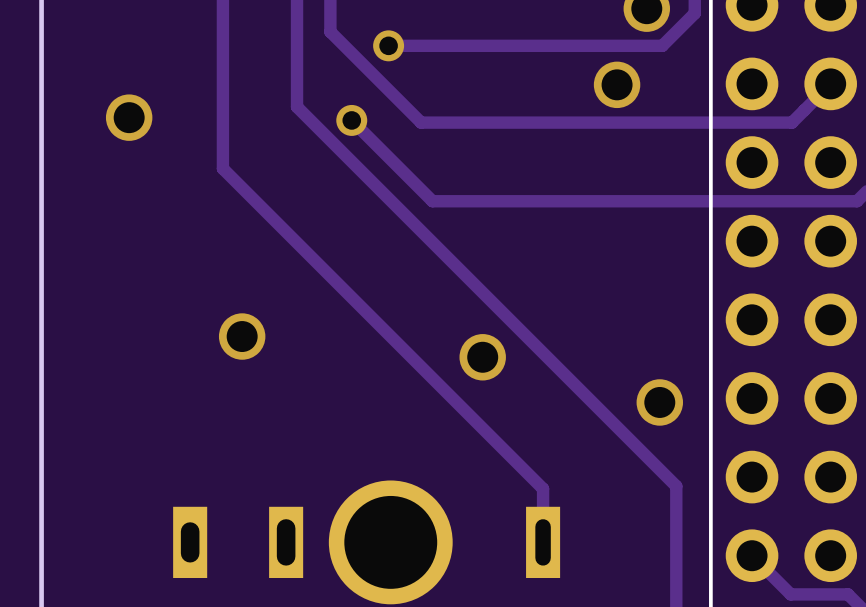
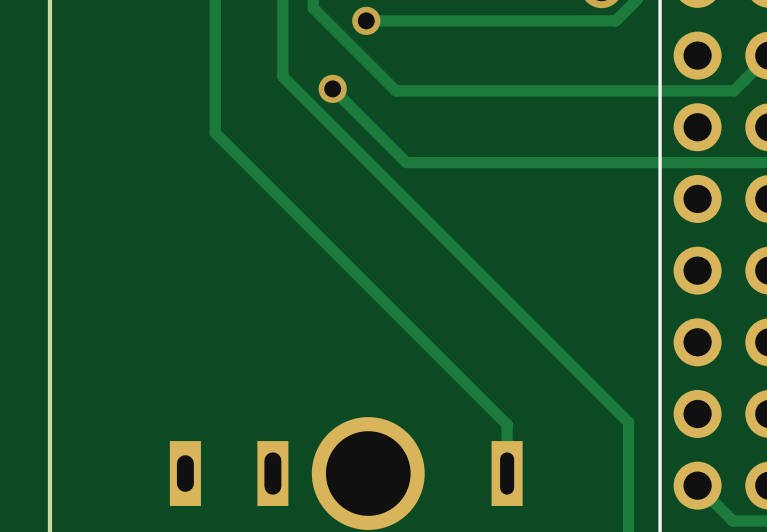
via: (617, 84) -> none
via: (129, 117) -> none
via: (242, 336) -> none
via: (482, 357) -> none
via: (659, 402) -> none

